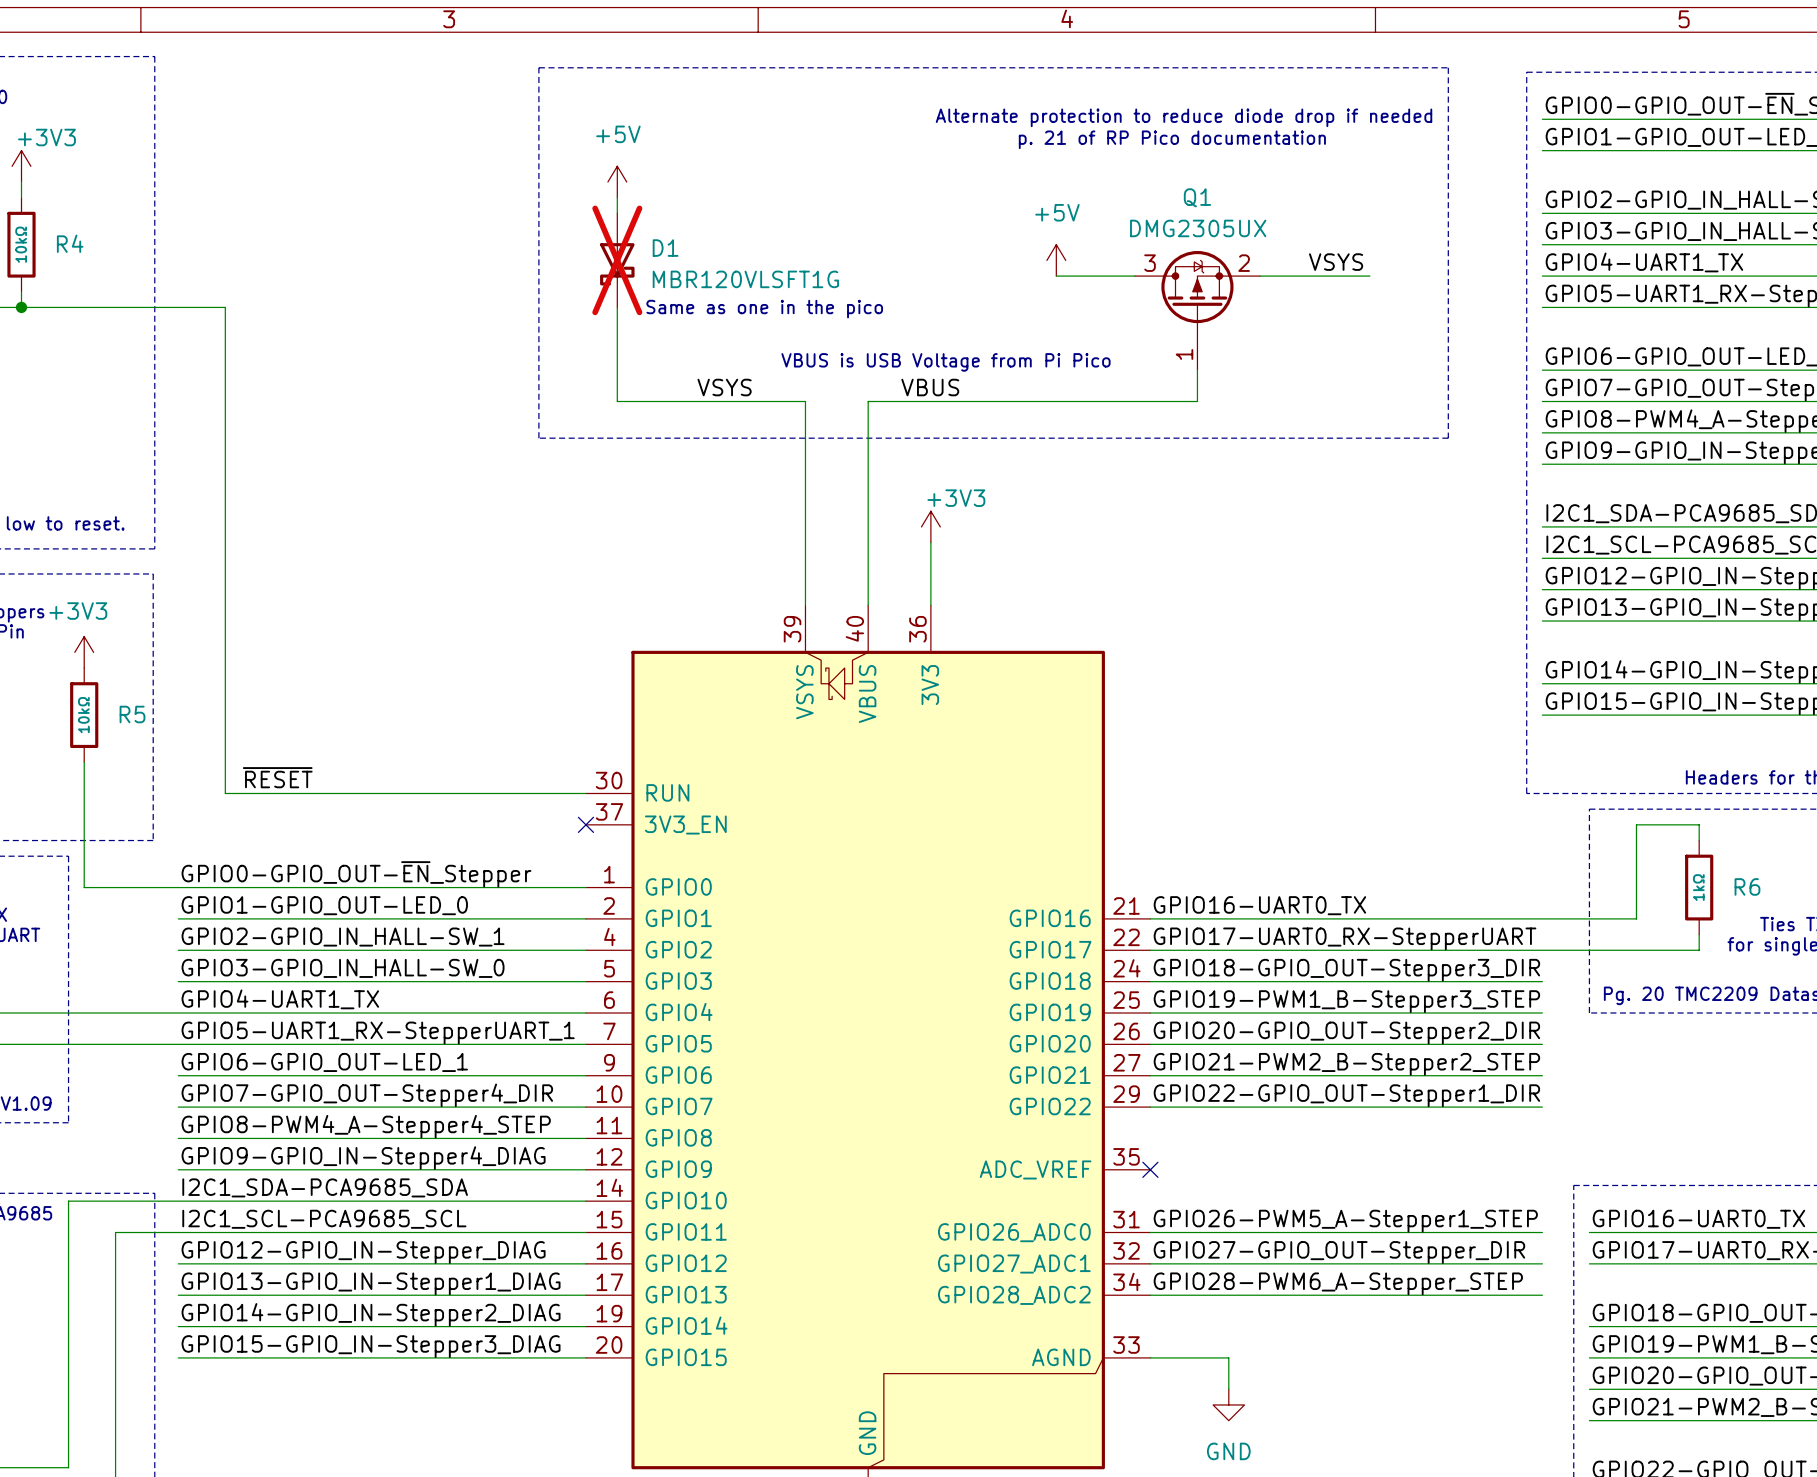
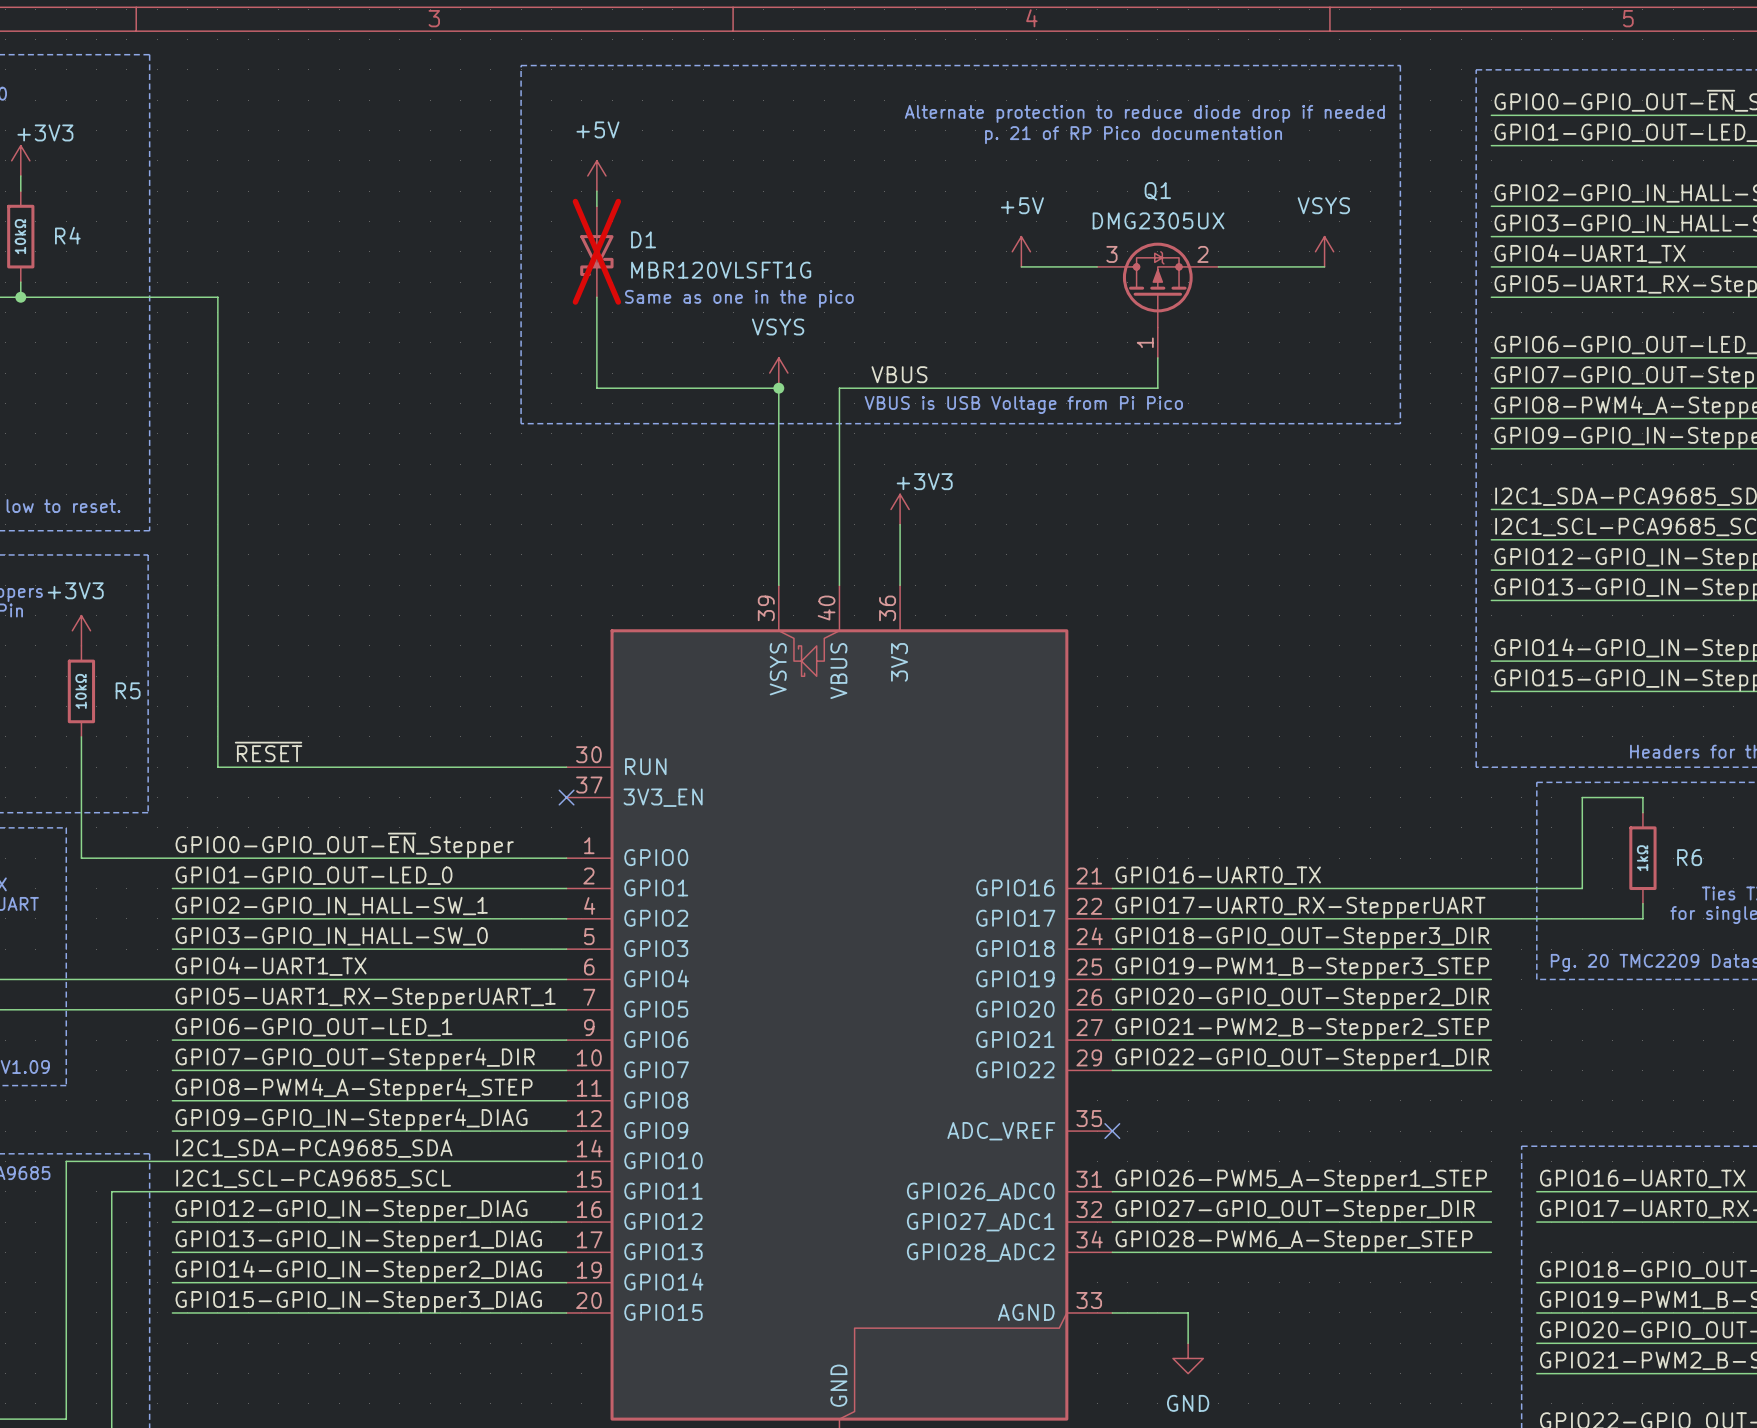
power symbol: none -> VSYS (1324, 251)
label: VSYS (1336, 262) -> none
text position: VBUS is USB Voltage from Pi Pico (945, 362) -> VBUS is USB Voltage from Pi Pico (1023, 404)
power symbol: none -> VSYS (778, 373)
label: VSYS (724, 387) -> none
junction: none -> (778, 388)

